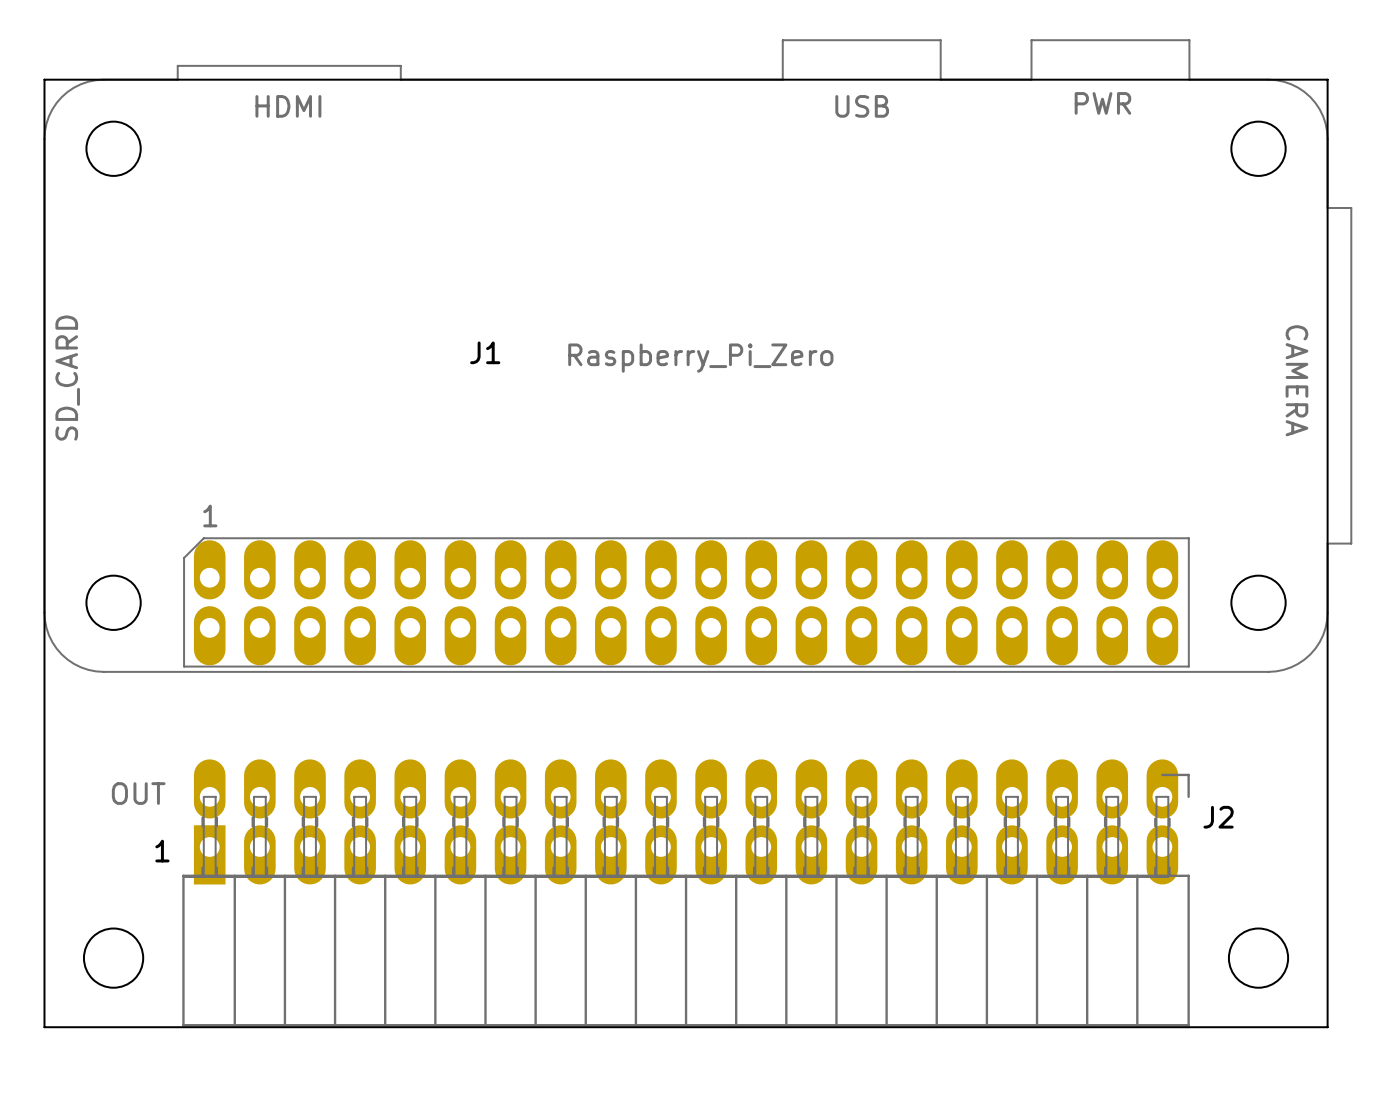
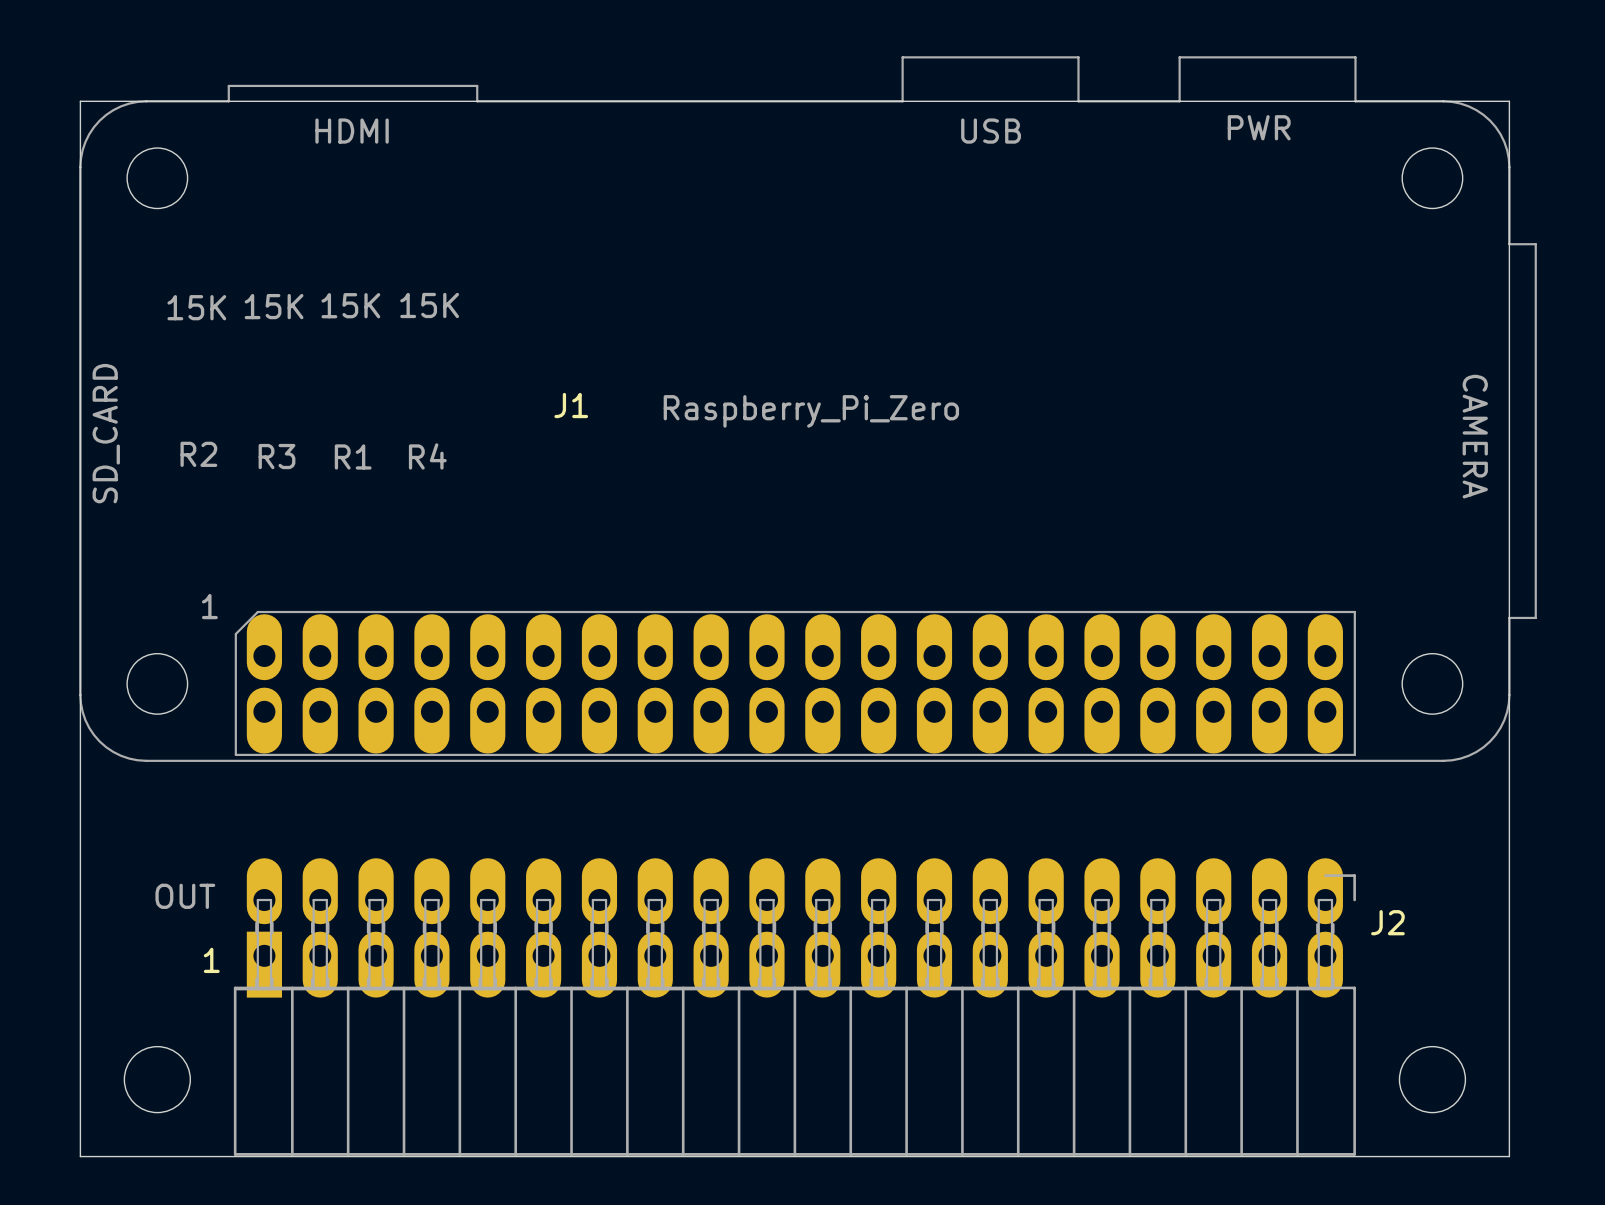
R2: none -> 15K (196, 381)
R3: none -> 15K (274, 381)
R1: none -> 15K (350, 381)
R4: none -> 15K (429, 381)
J1 text position: 1 (210, 515) -> 1 (209, 606)

